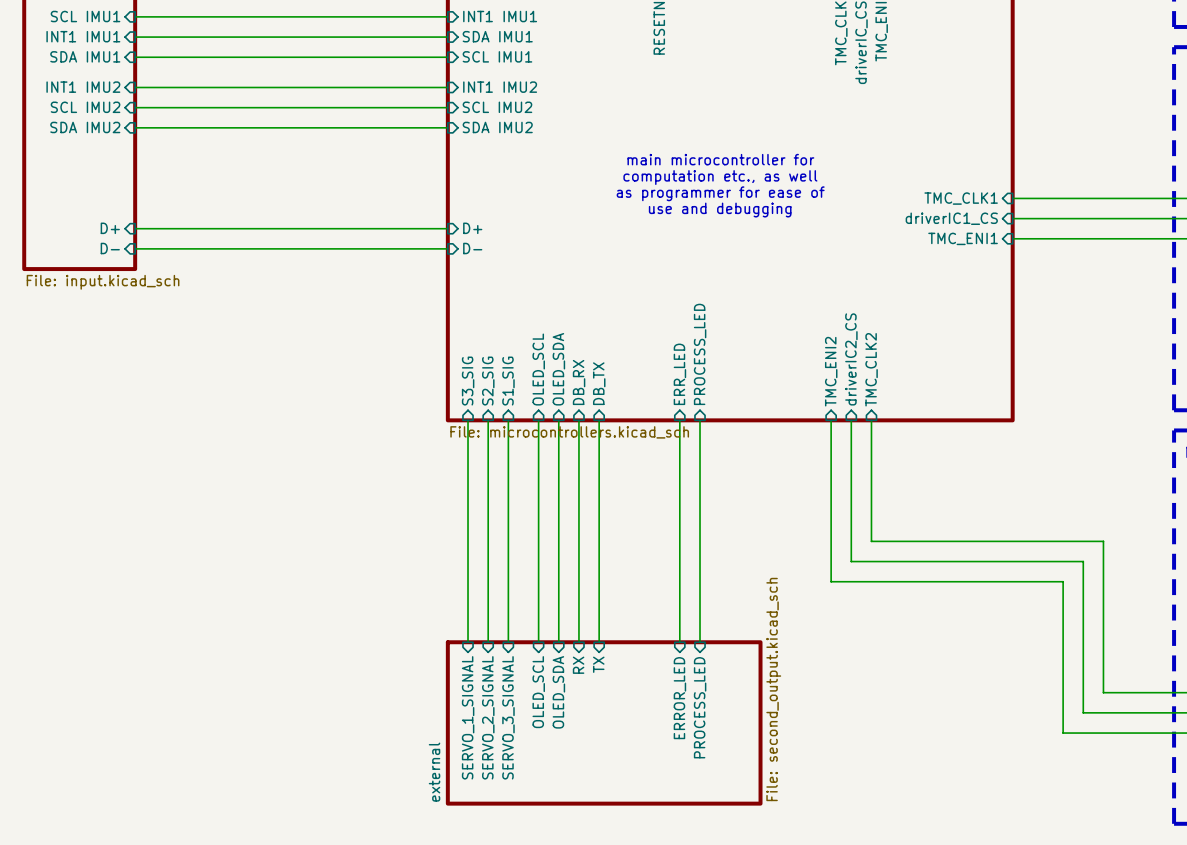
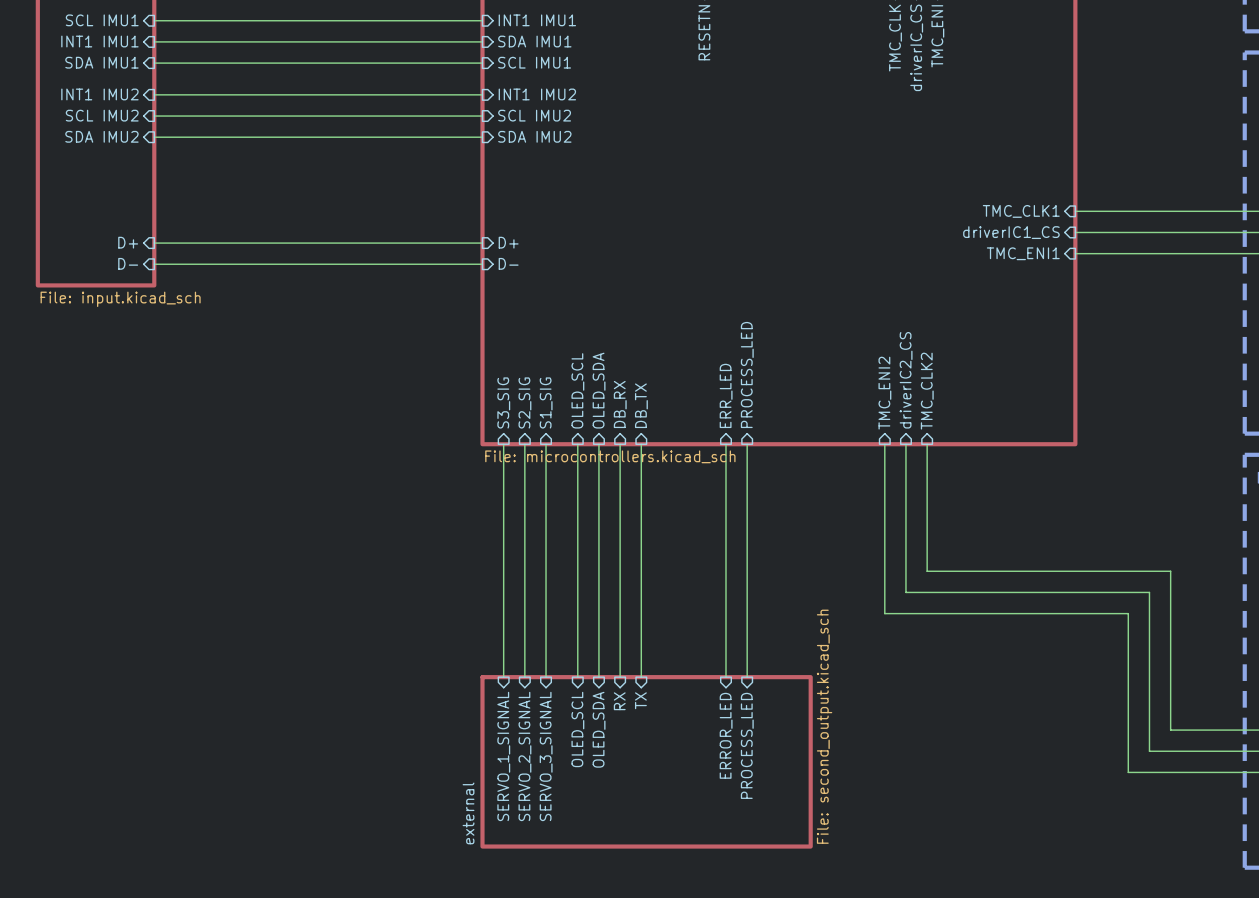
text: main microcontroller for (720, 159) -> none
text: computation etc., as well (720, 177) -> none
text: as programmer for ease of (720, 193) -> none
text: use and debugging (720, 210) -> none

